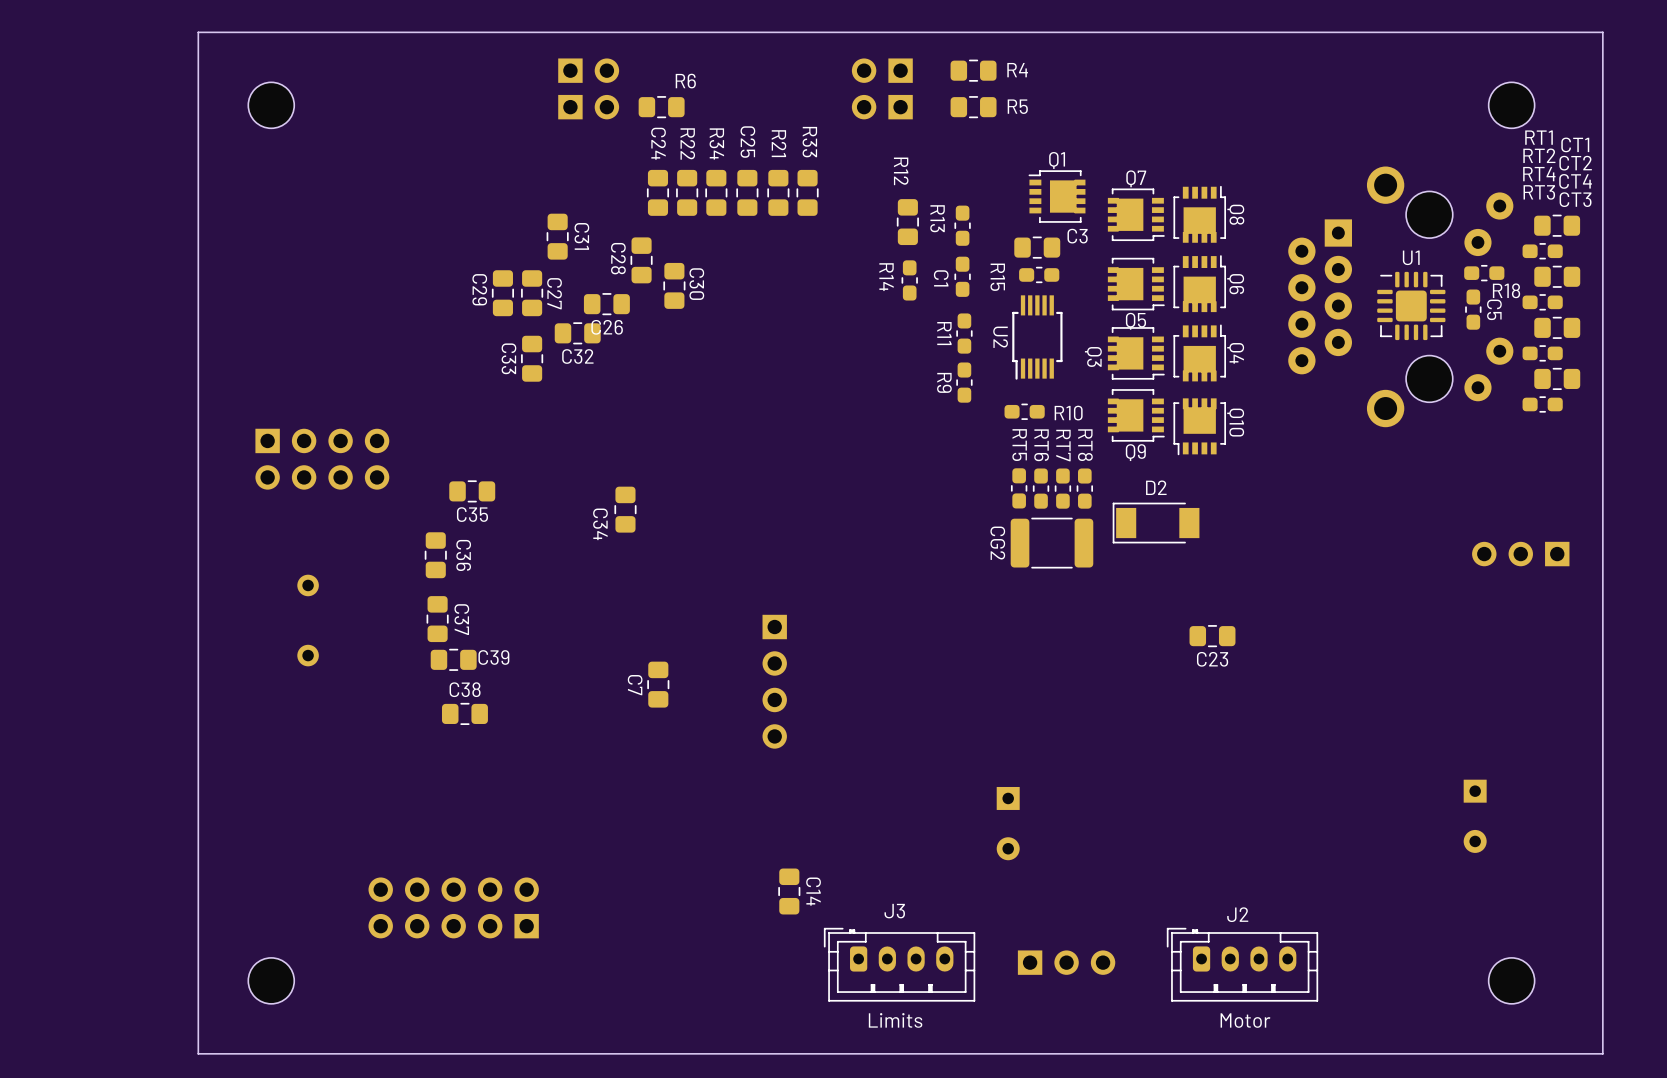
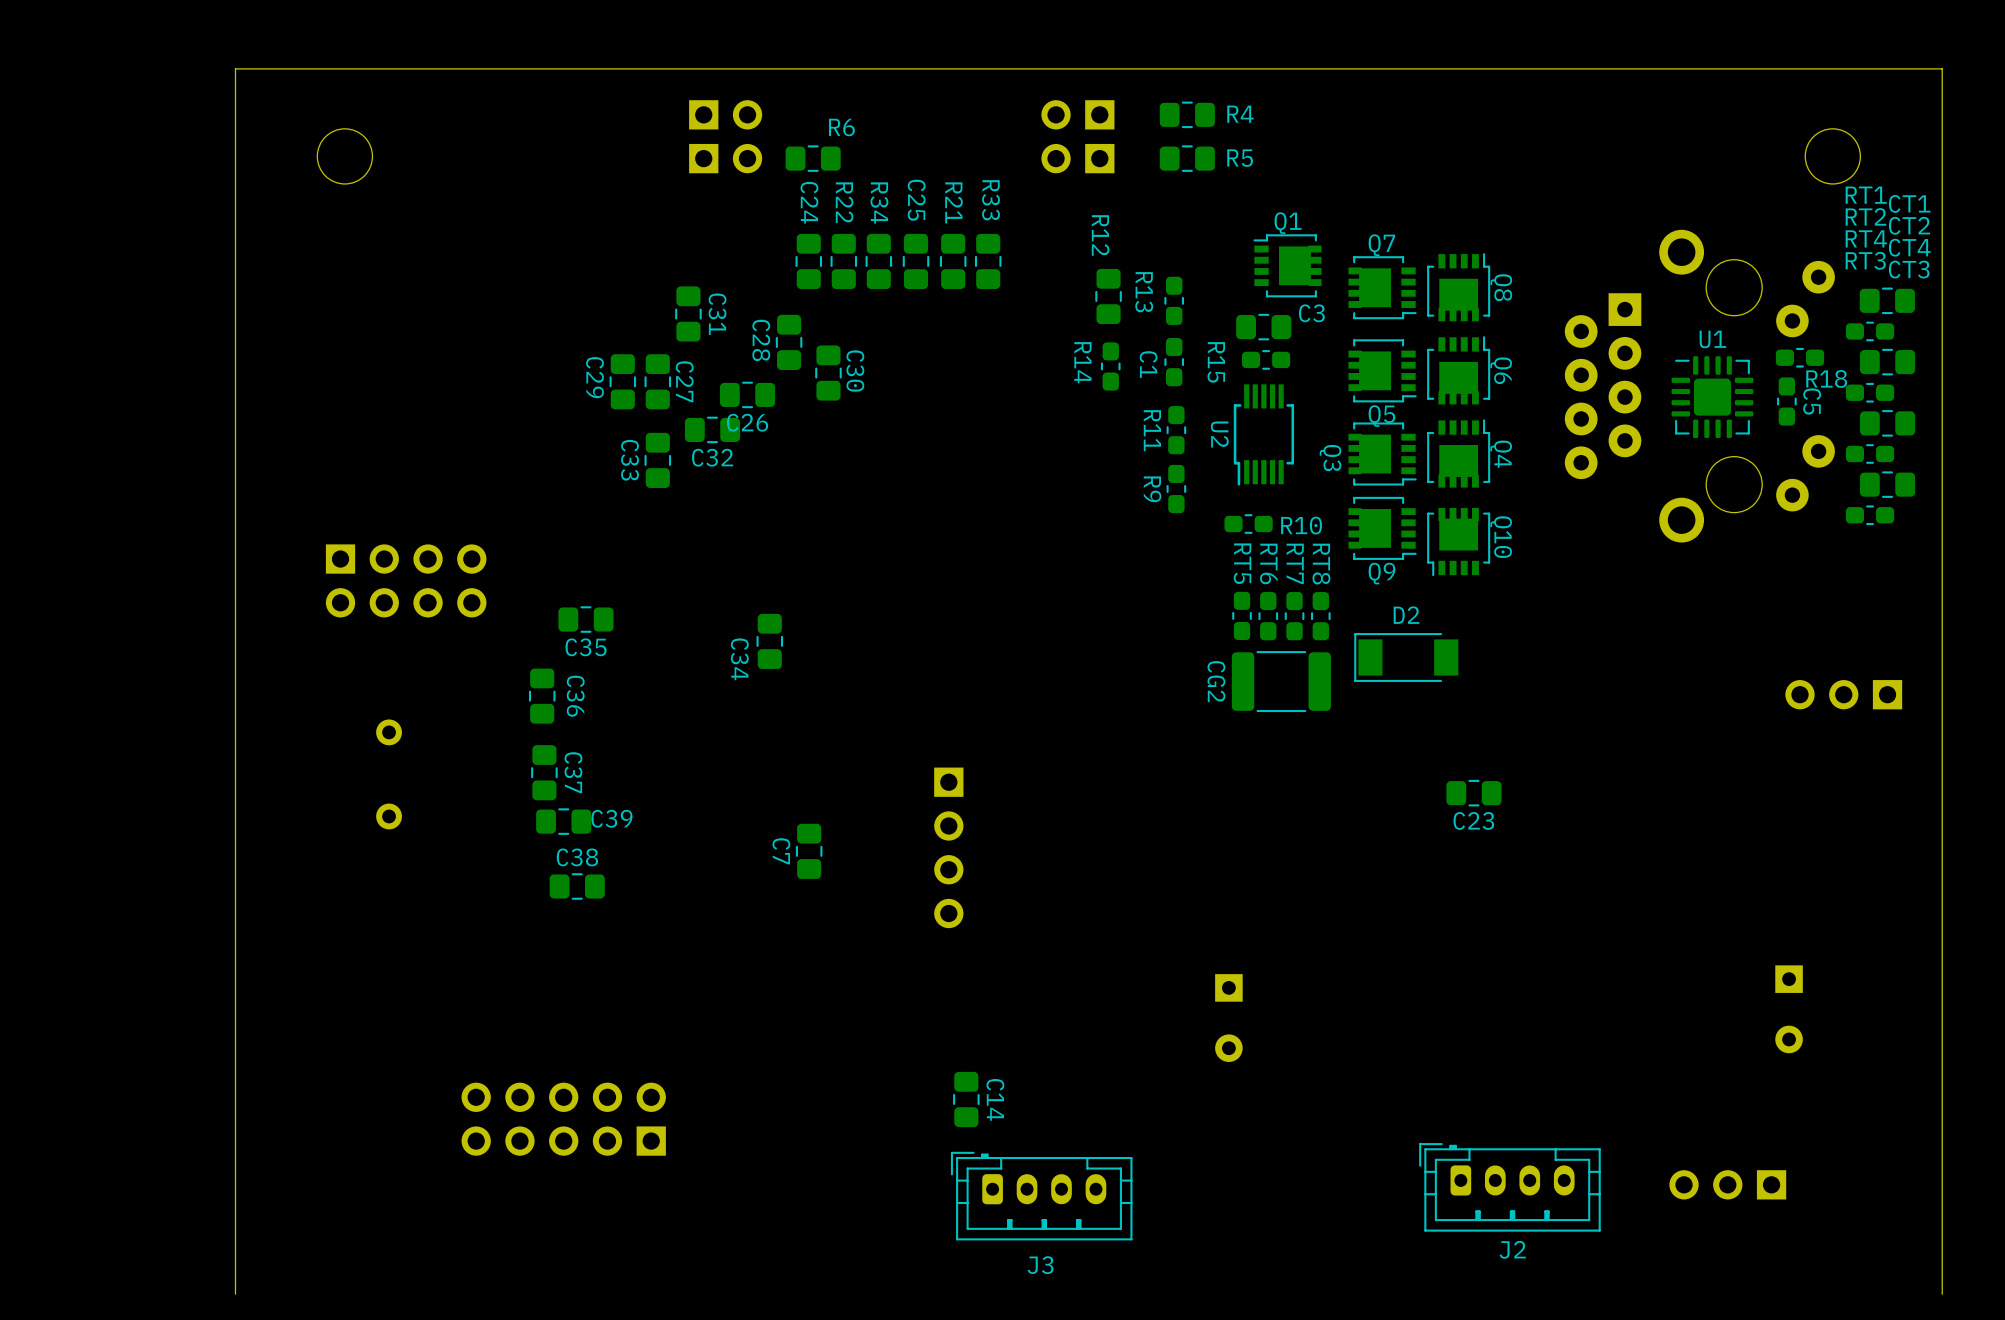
board edge: (198, 32) (198, 1053) (1602, 1053) -> (257, 68) (235, 68) (235, 1294)
J3 name position: J3 (894, 911) -> J3 (1040, 1265)
J2 name position: J2 (1237, 914) -> J2 (1512, 1249)
part rotation: 0° (1066, 962) -> 180° (1727, 1184)
part position: (1066, 962) -> (1727, 1184)
J3 position: (899, 964) -> (1041, 1196)
part: (271, 980) -> none
part: (1511, 980) -> none
J3 value: Limits (895, 1020) -> none
J2 value: Motor (1245, 1020) -> none

